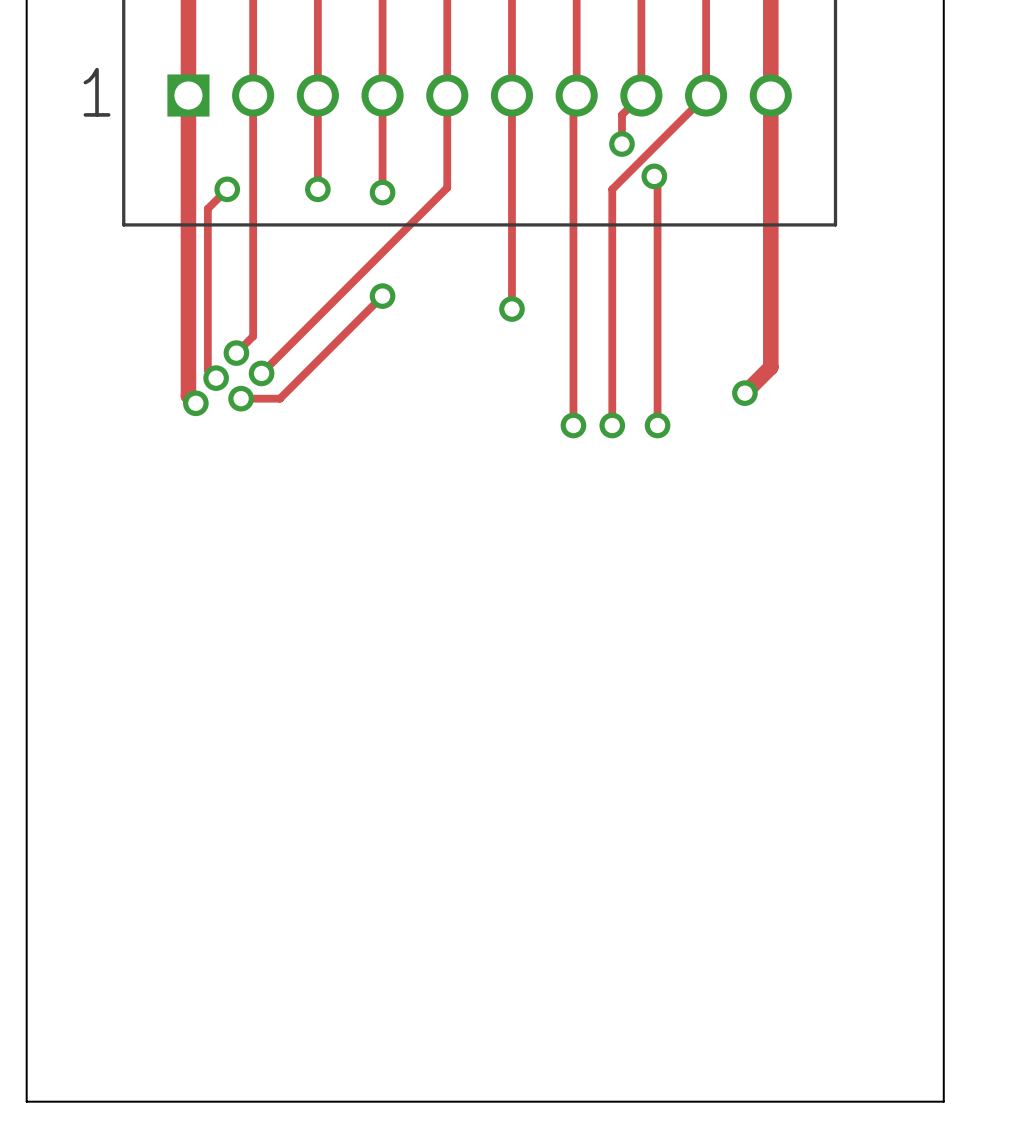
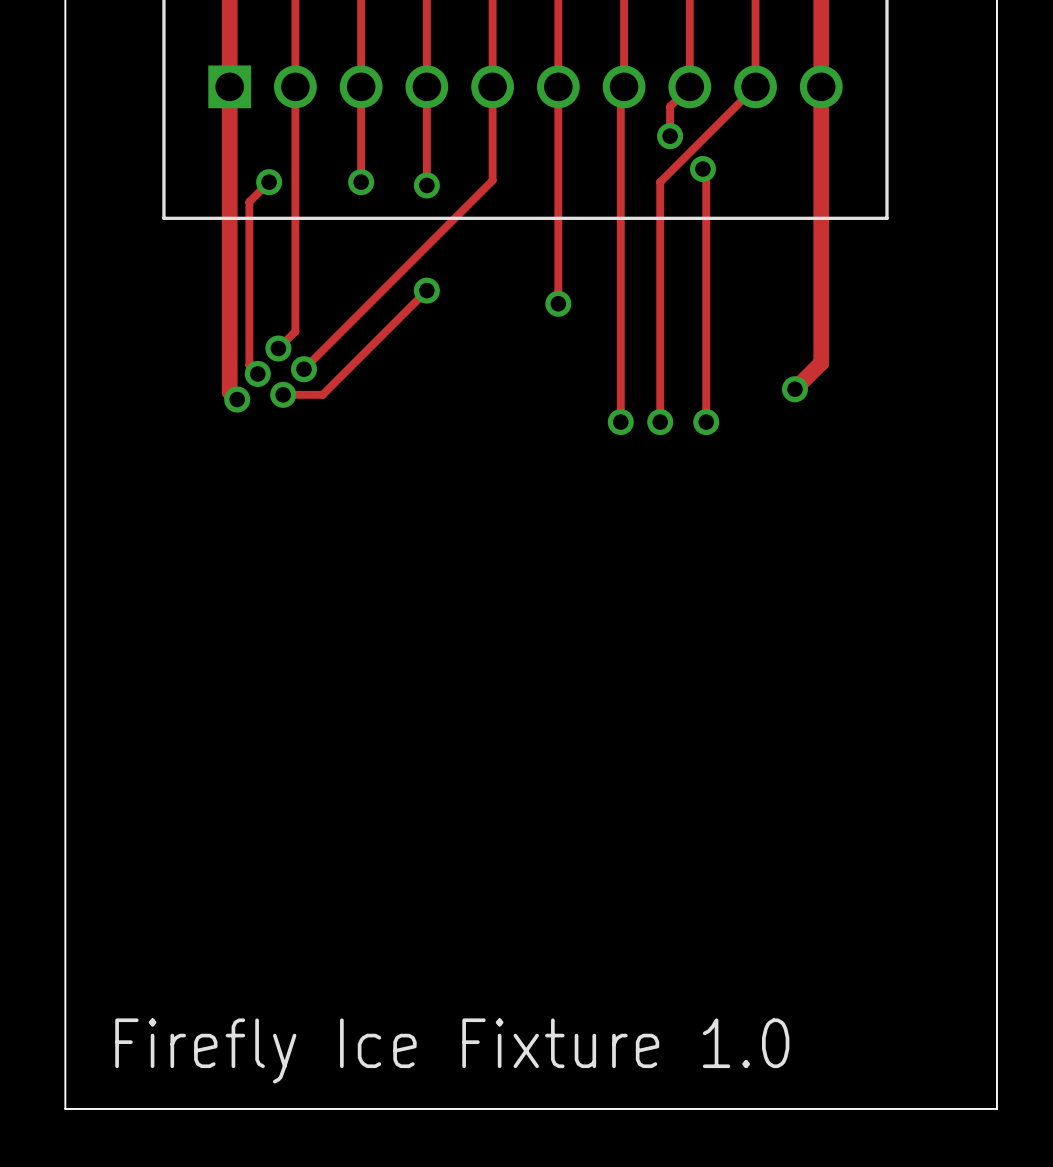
text: 1 (97, 92) -> none
text: none -> Firefly Ice Fixture 1.0 (452, 1050)

